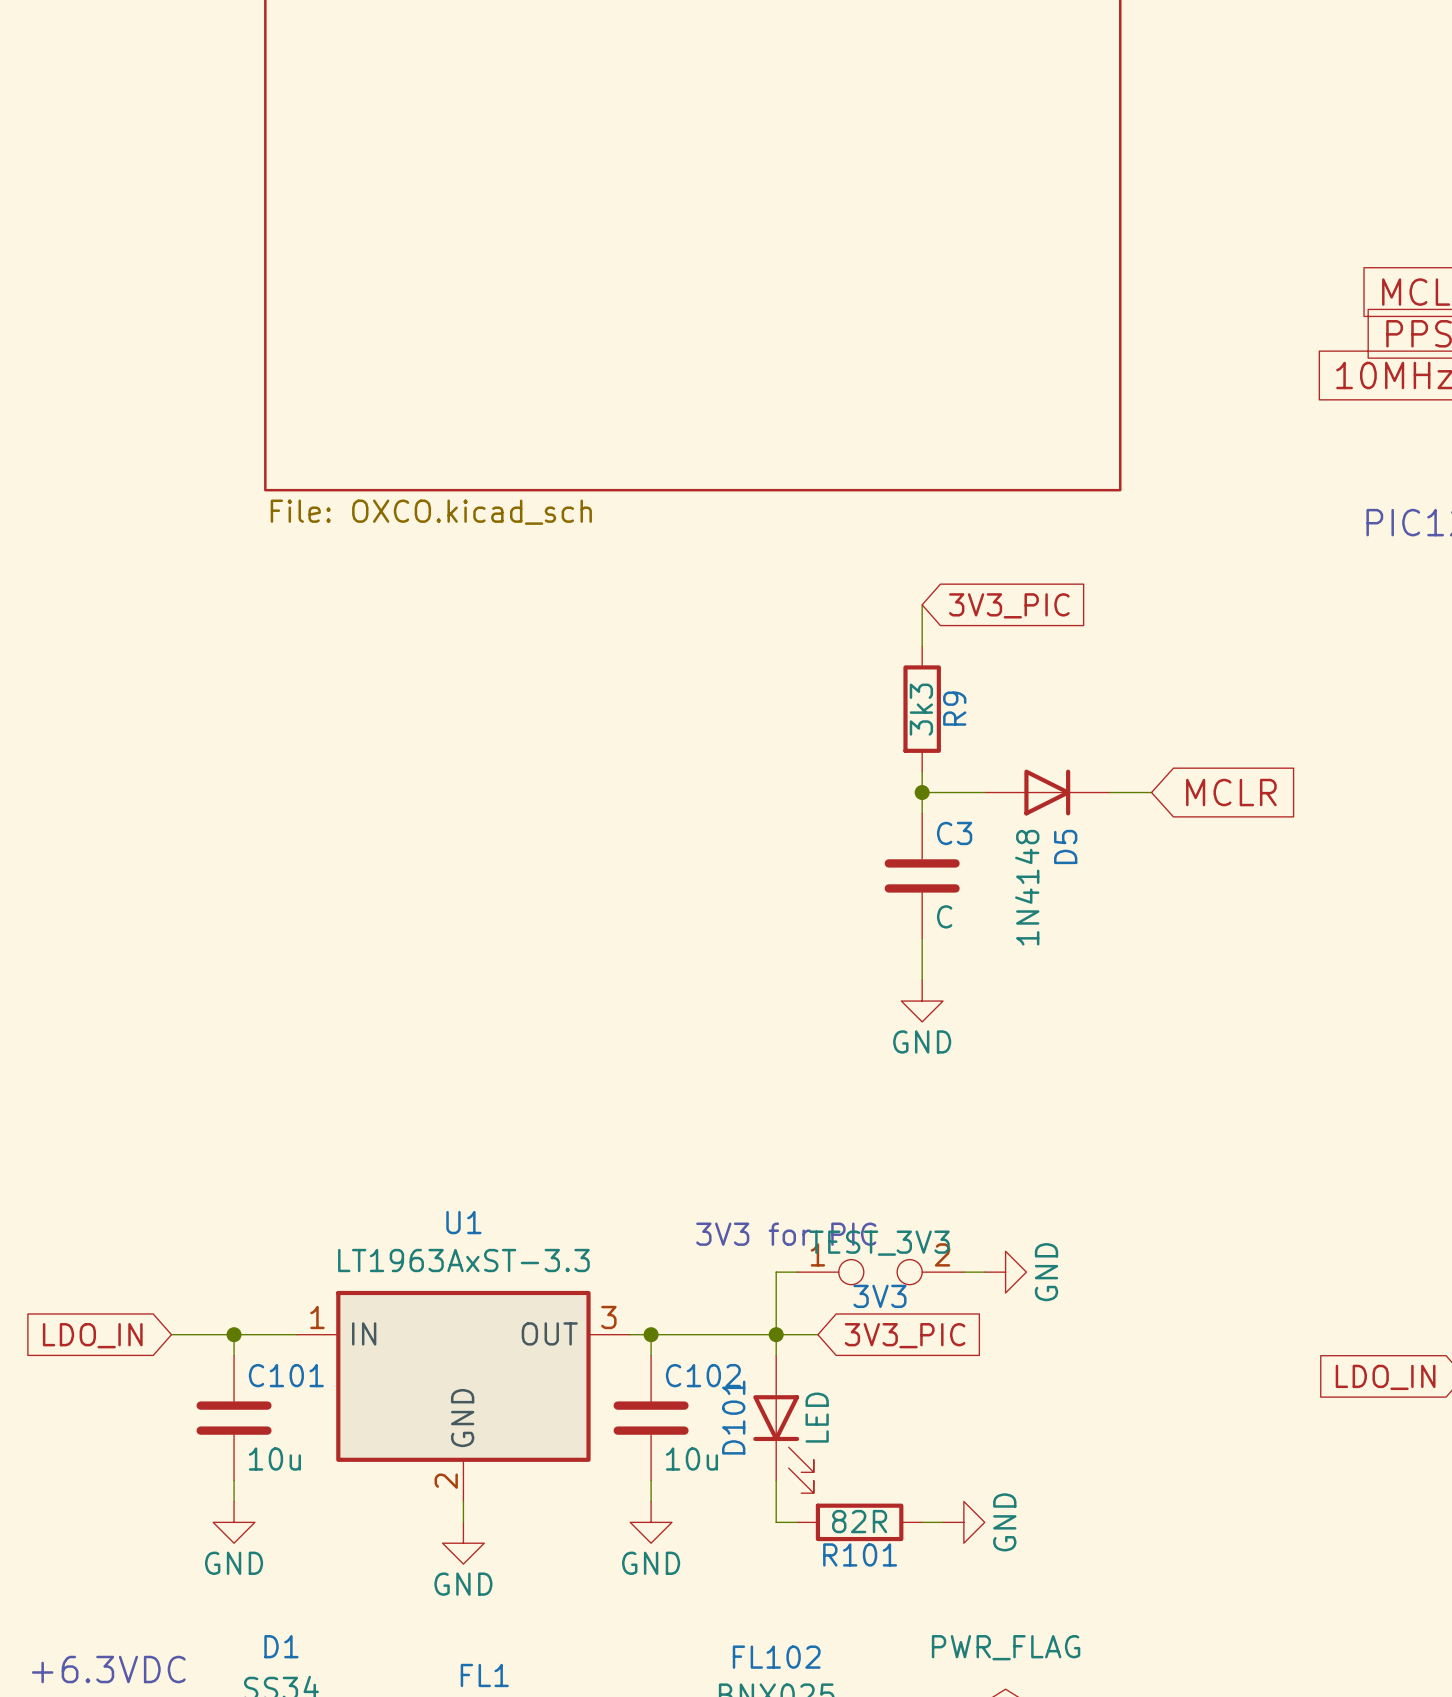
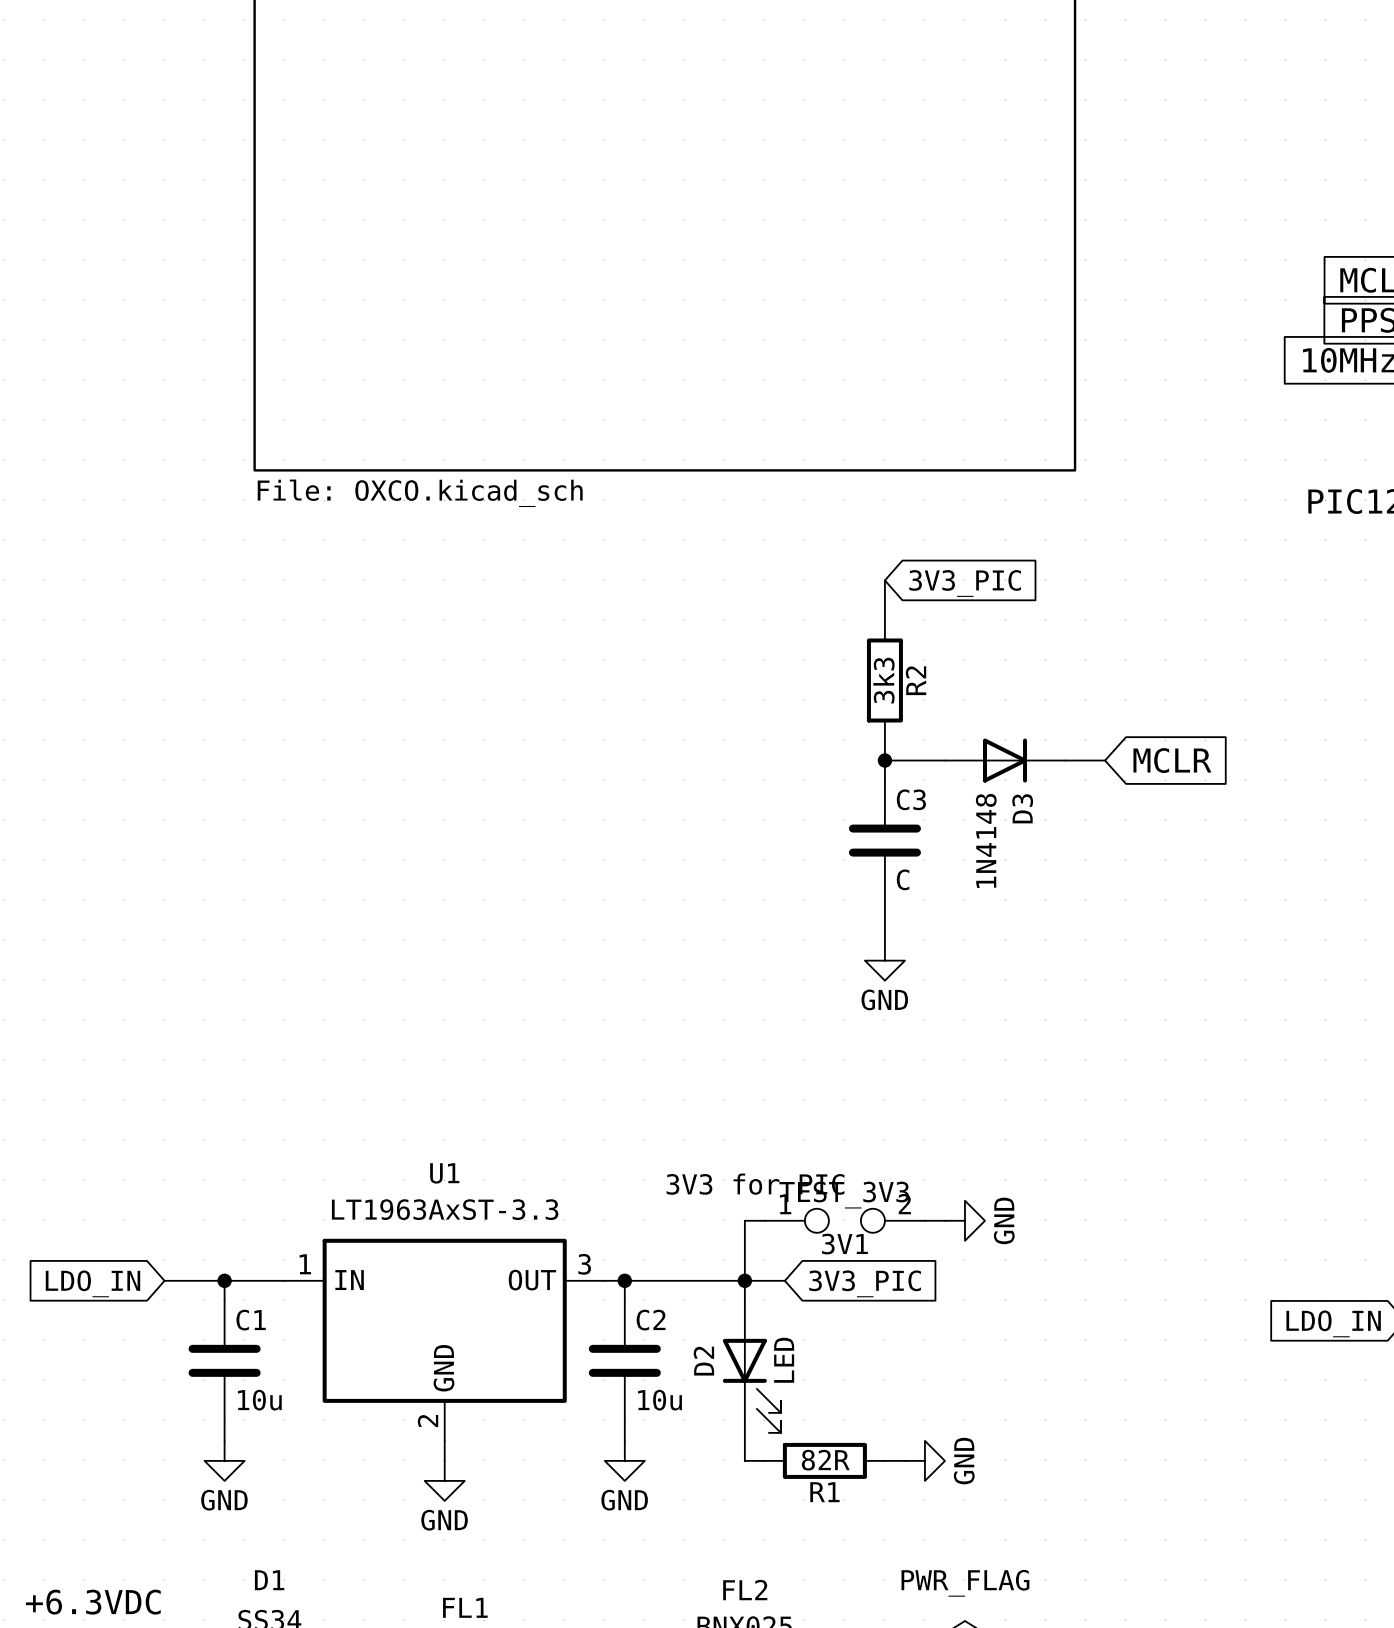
R9 name: R9 (954, 708) -> R2 (916, 680)
D5 name: D5 (1065, 846) -> D3 (1022, 808)
3V3 name: 3V3 (879, 1296) -> 3V1 (844, 1244)
C101 name: C101 (286, 1375) -> C1 (251, 1320)
C102 name: C102 (703, 1375) -> C2 (651, 1320)
D101 name: D101 (733, 1417) -> D2 (703, 1361)
R101 name: R101 (860, 1554) -> R1 (824, 1492)
FL102 name: FL102 (776, 1657) -> FL2 (745, 1590)

